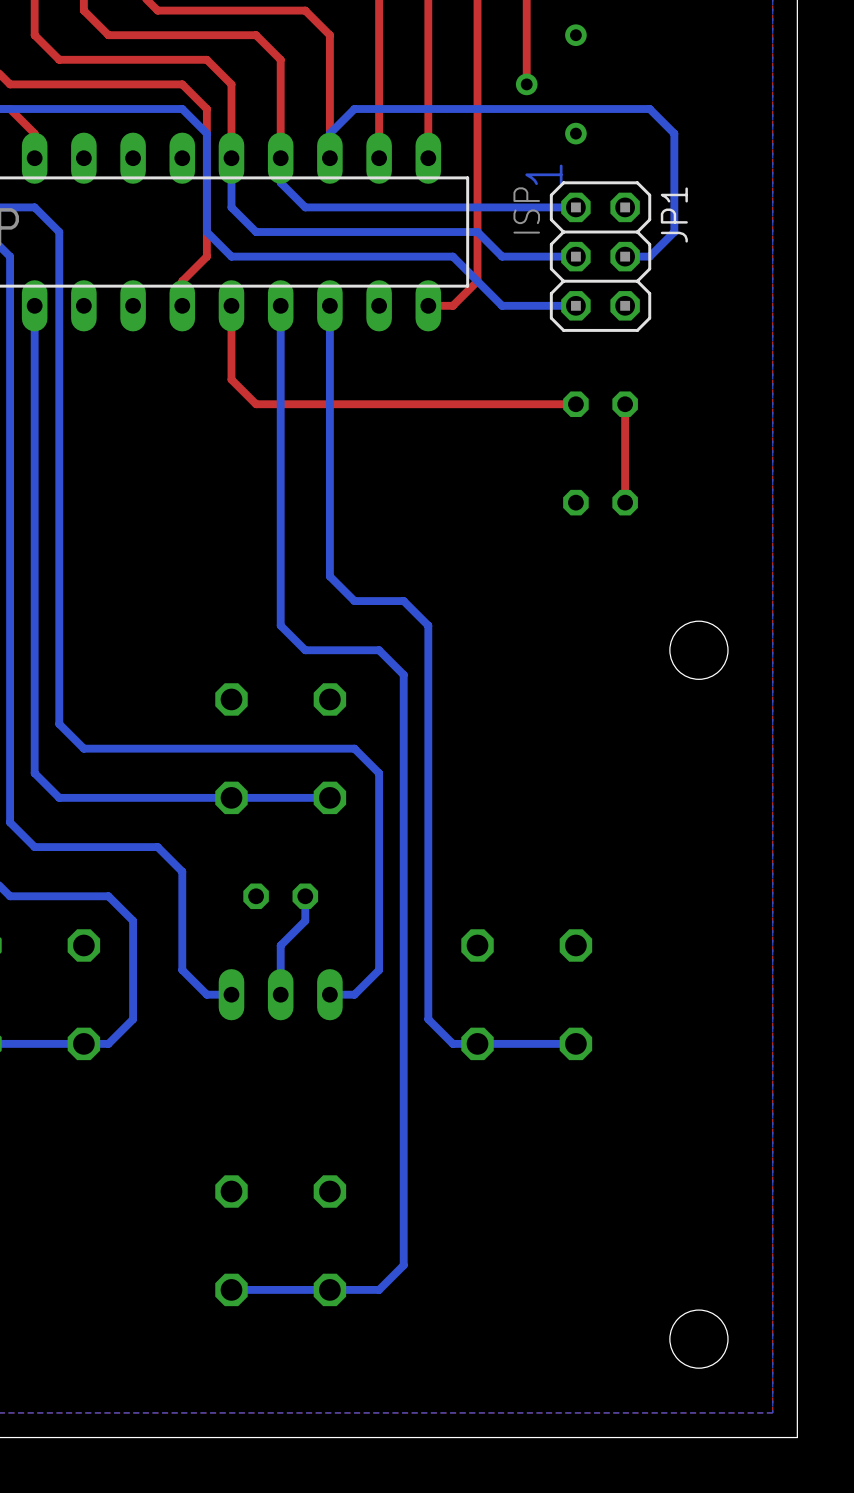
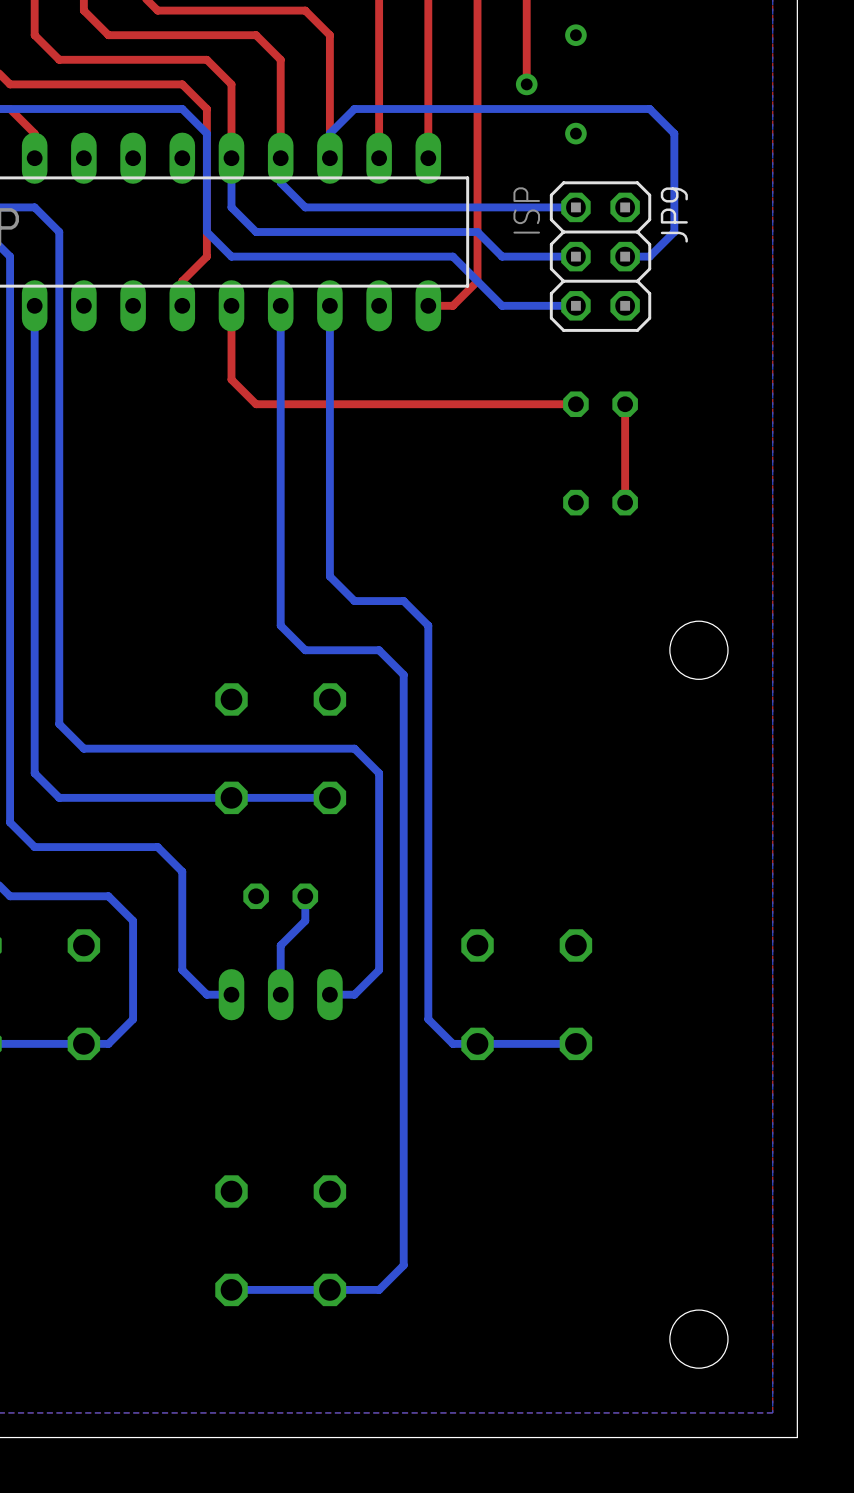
text: 1 (543, 174) -> none
JP1 name: JP1 (674, 215) -> JP9 (674, 215)

